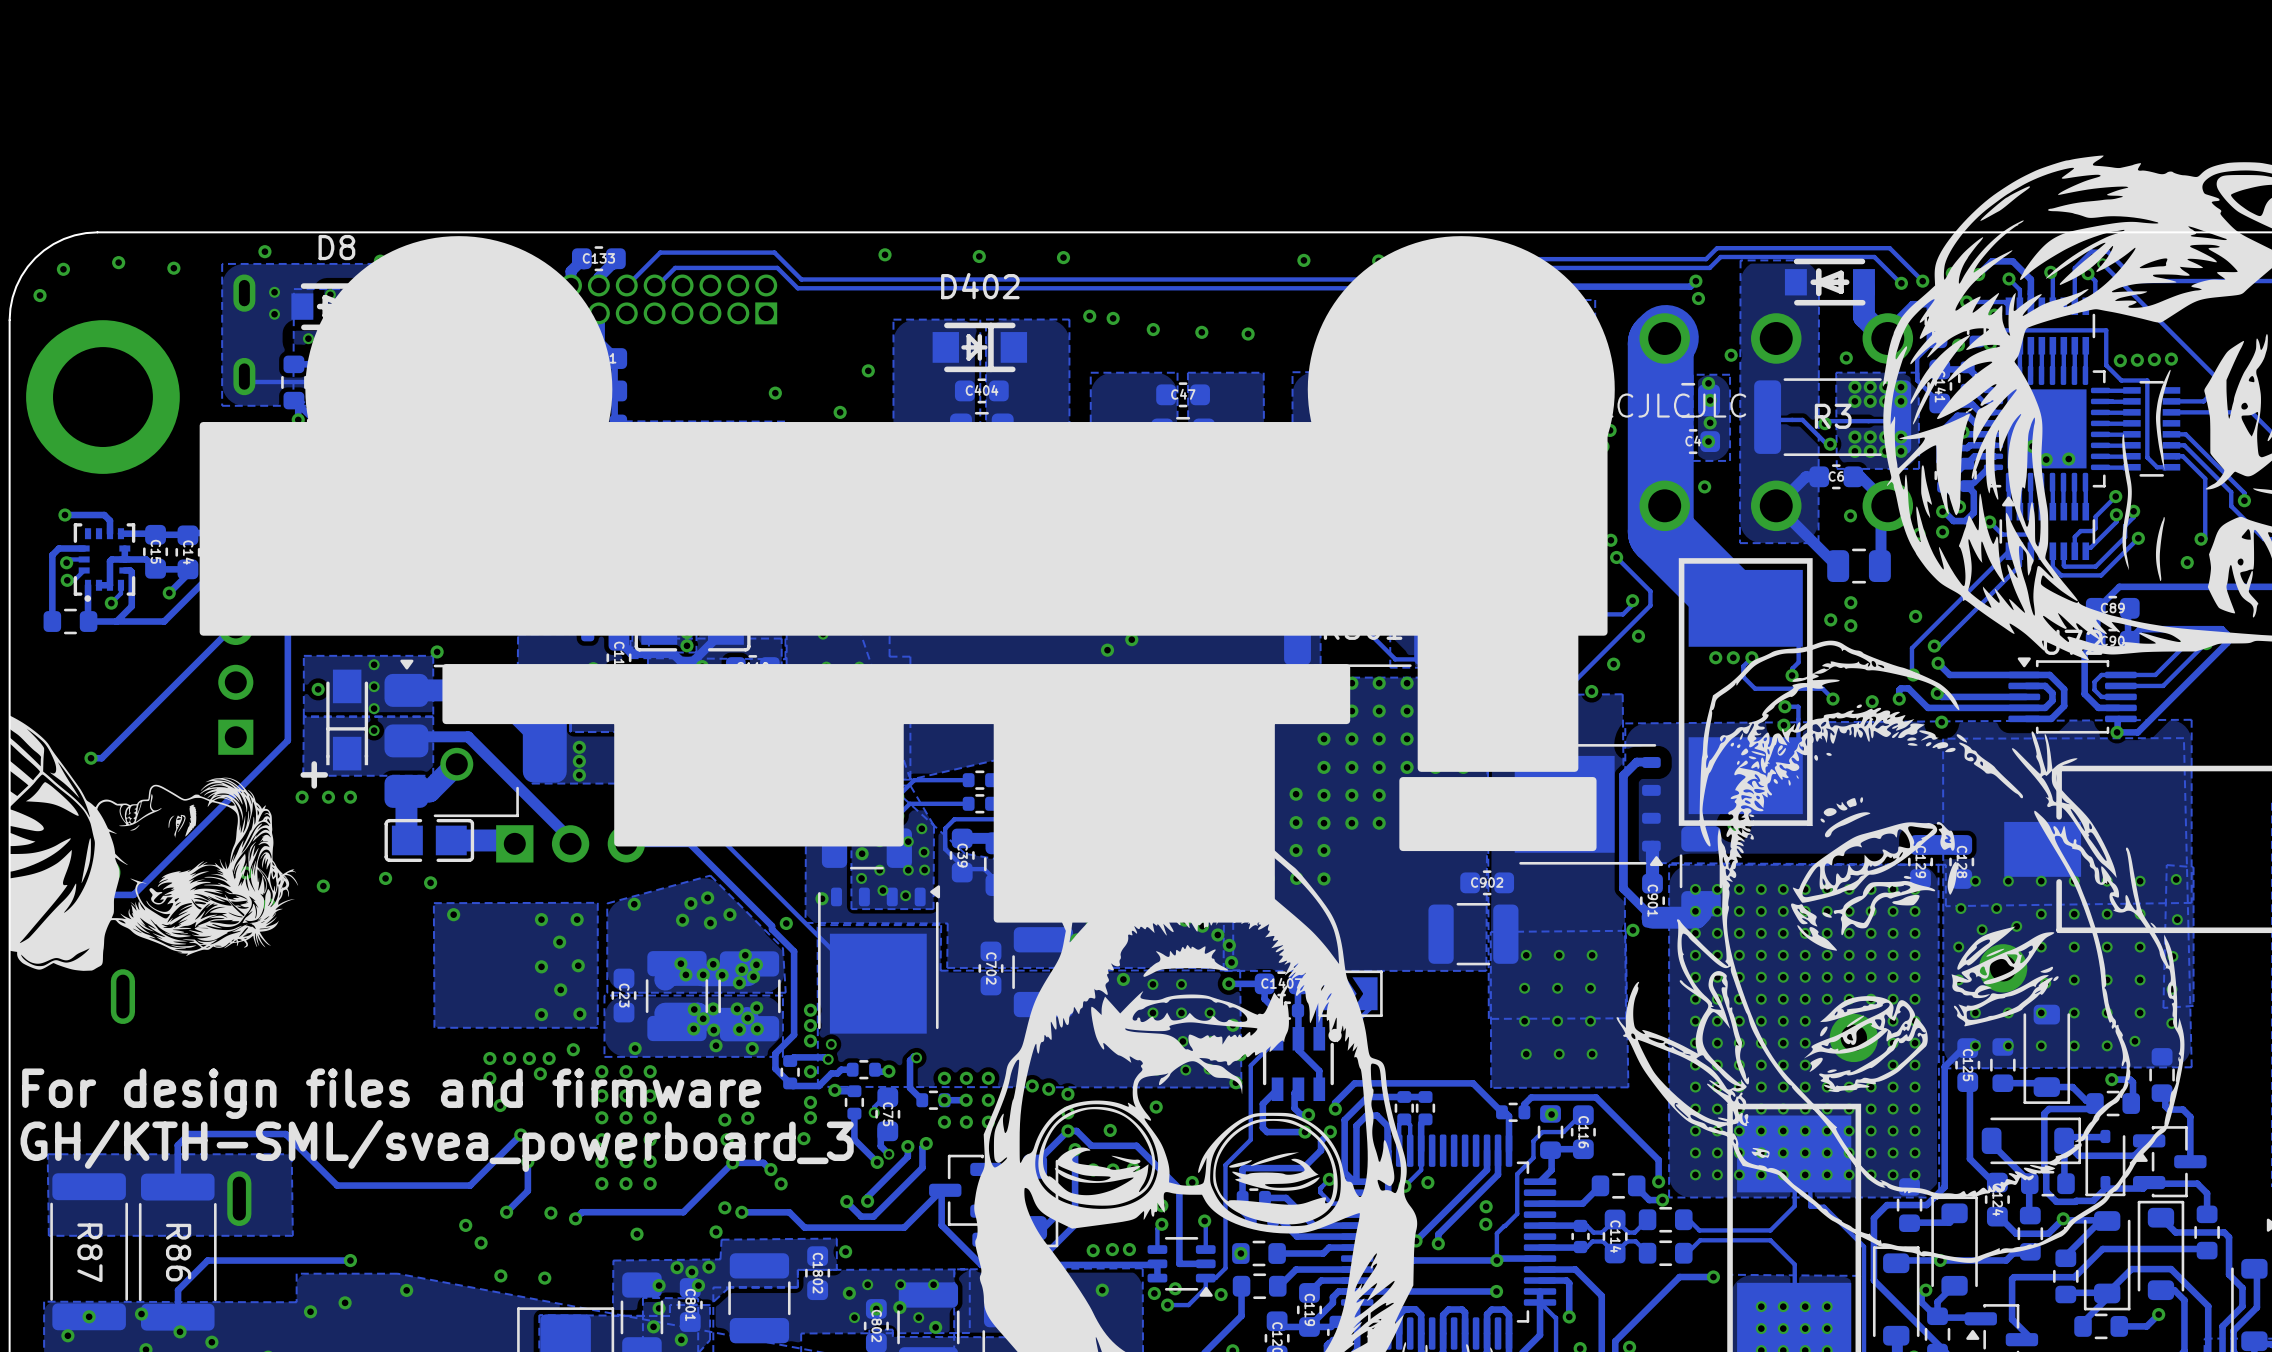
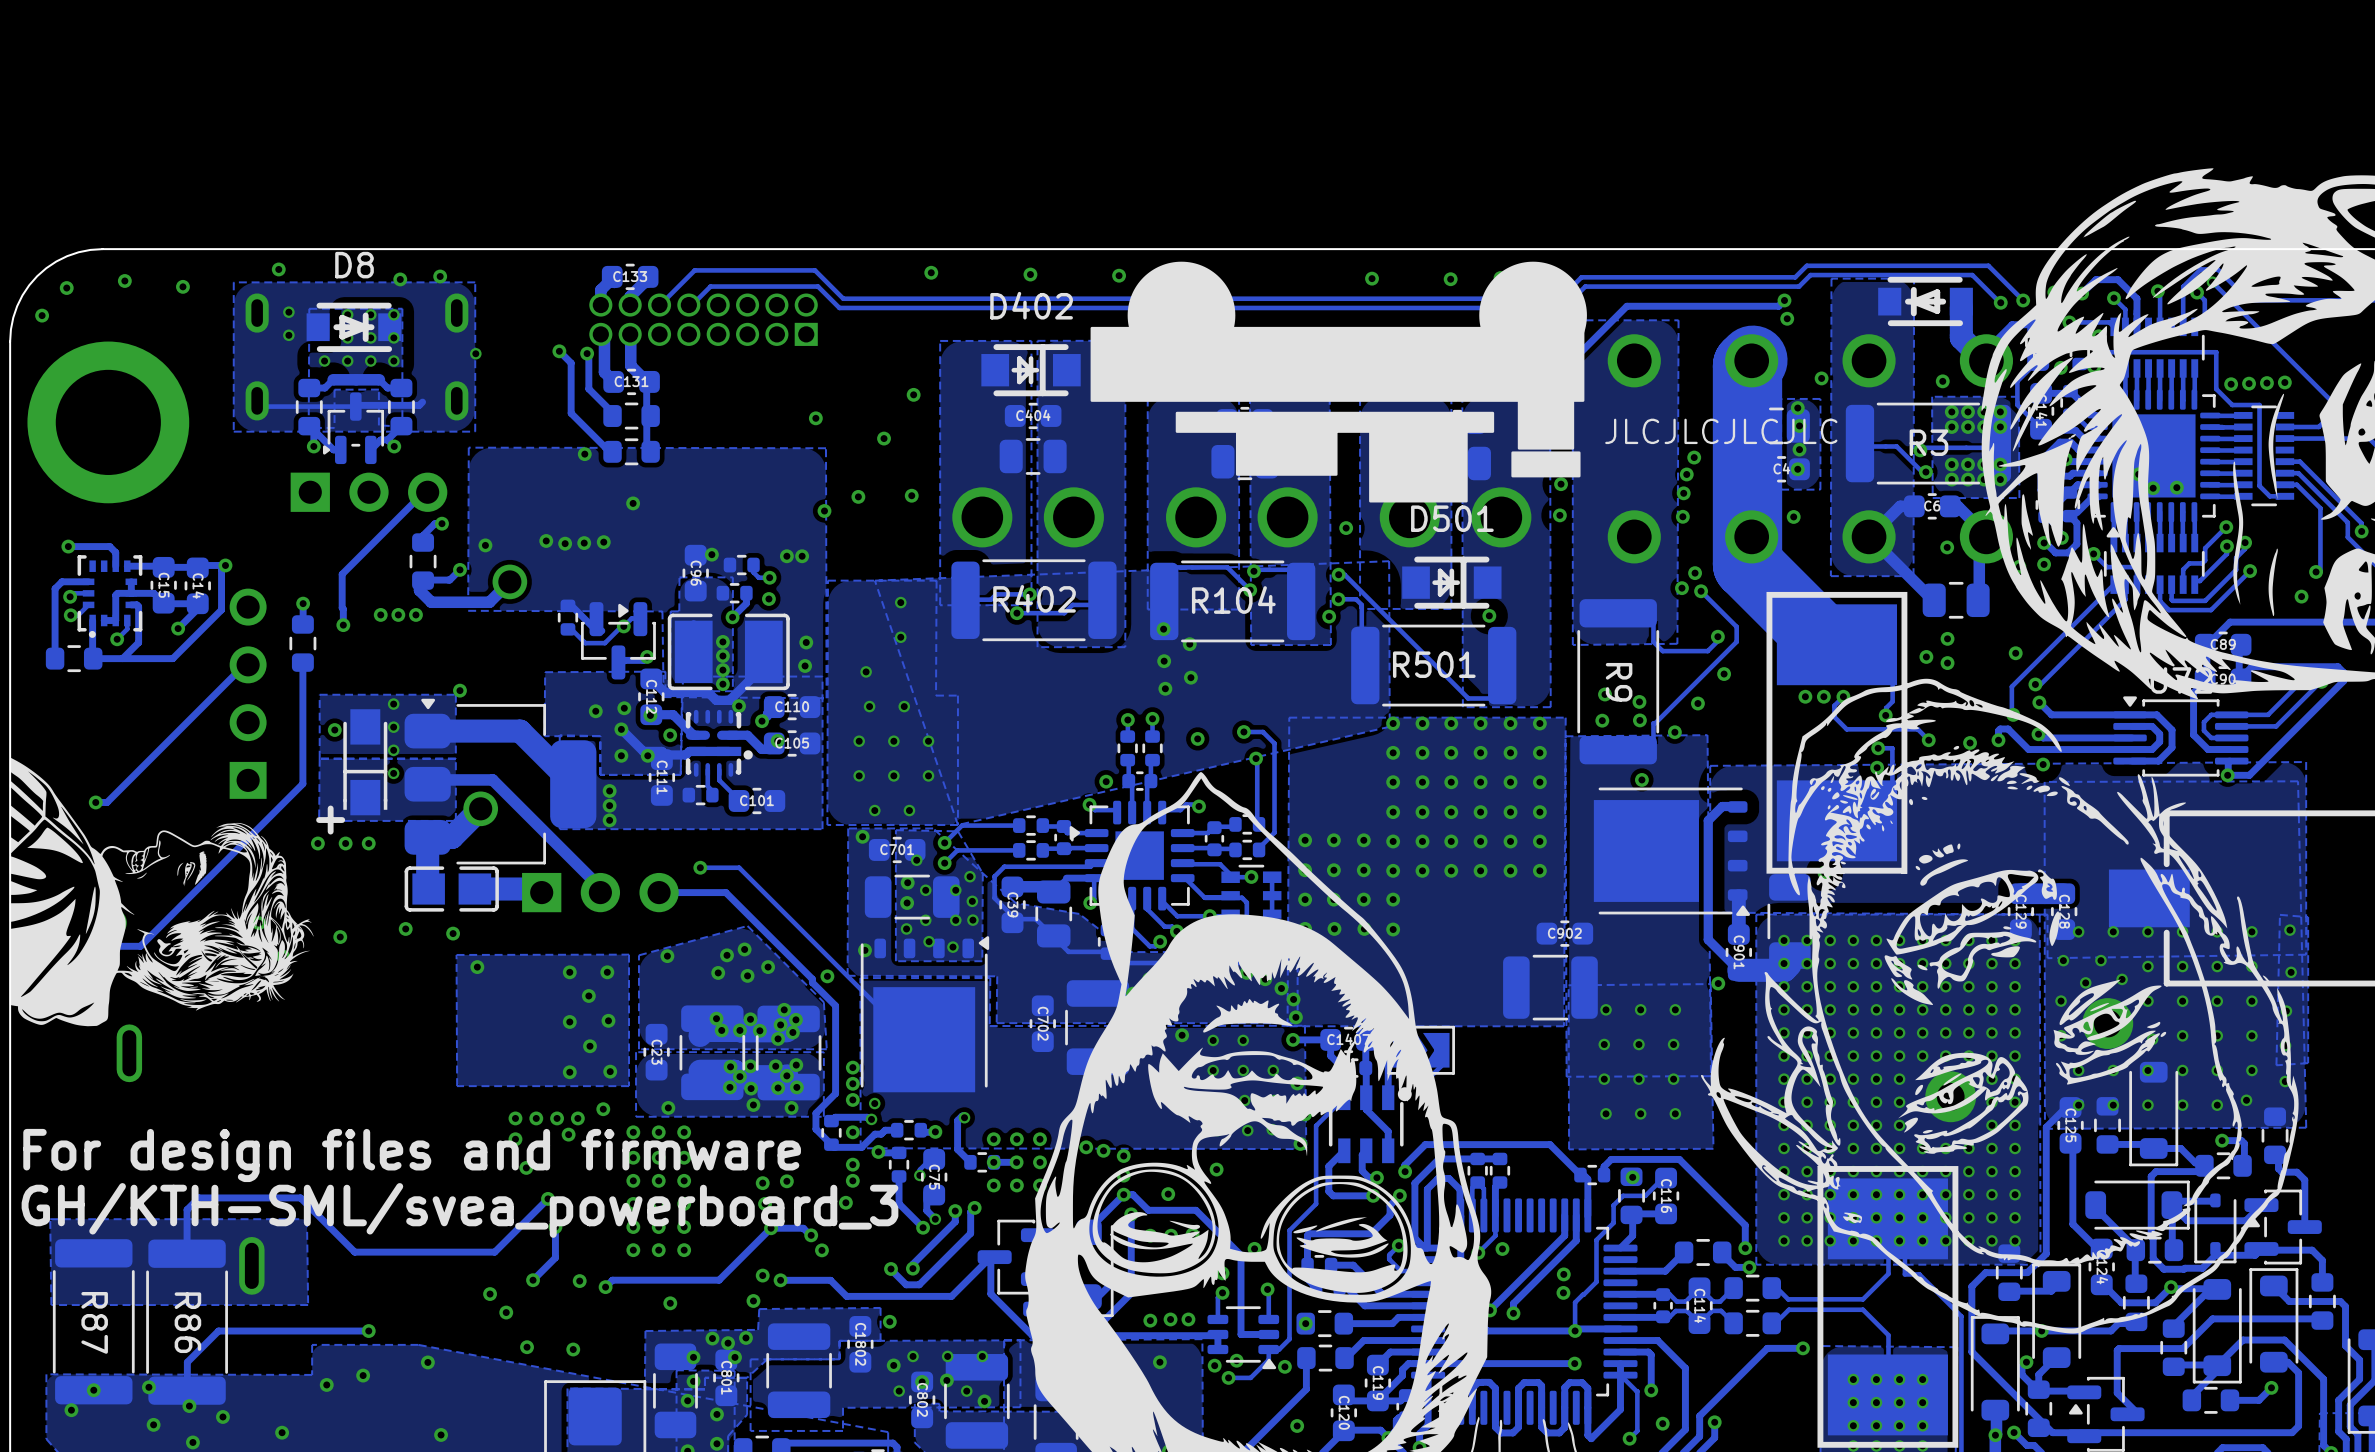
drawing: [199, 236, 1608, 852] -> none
drawing shape: [1307, 236, 1615, 543] -> [1517, 396, 1575, 450]
drawing: none -> [1090, 261, 1587, 503]
drawing: [442, 664, 1351, 923] -> none

